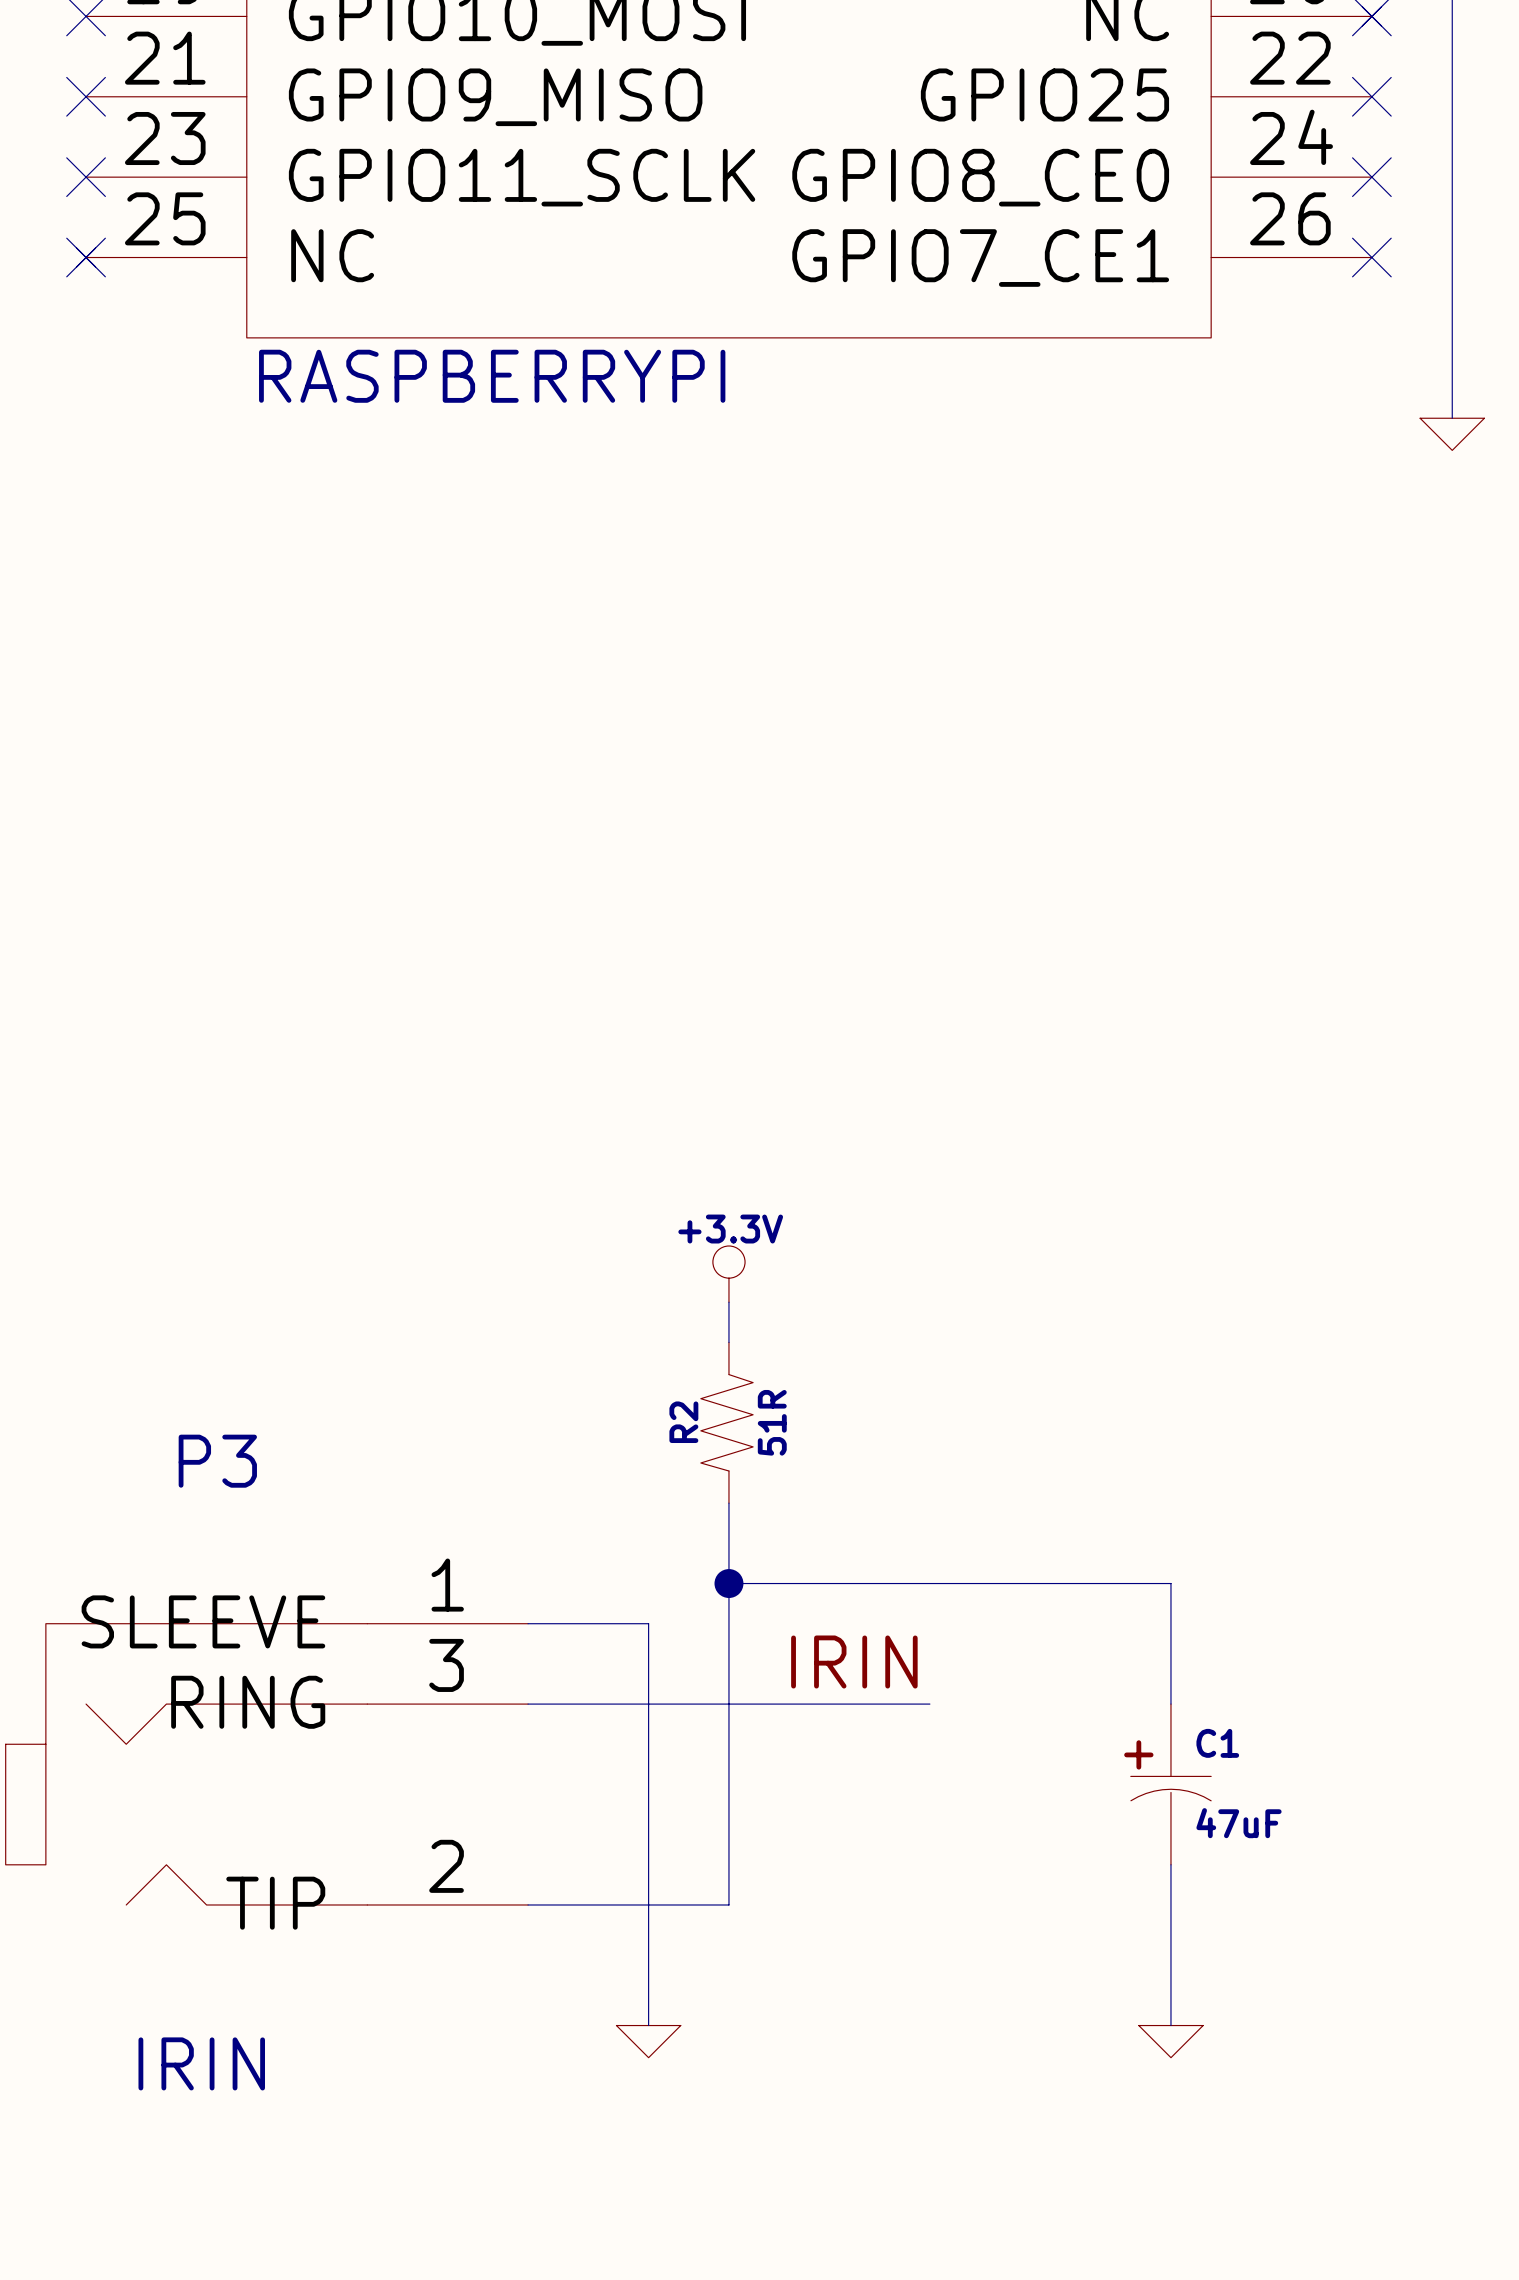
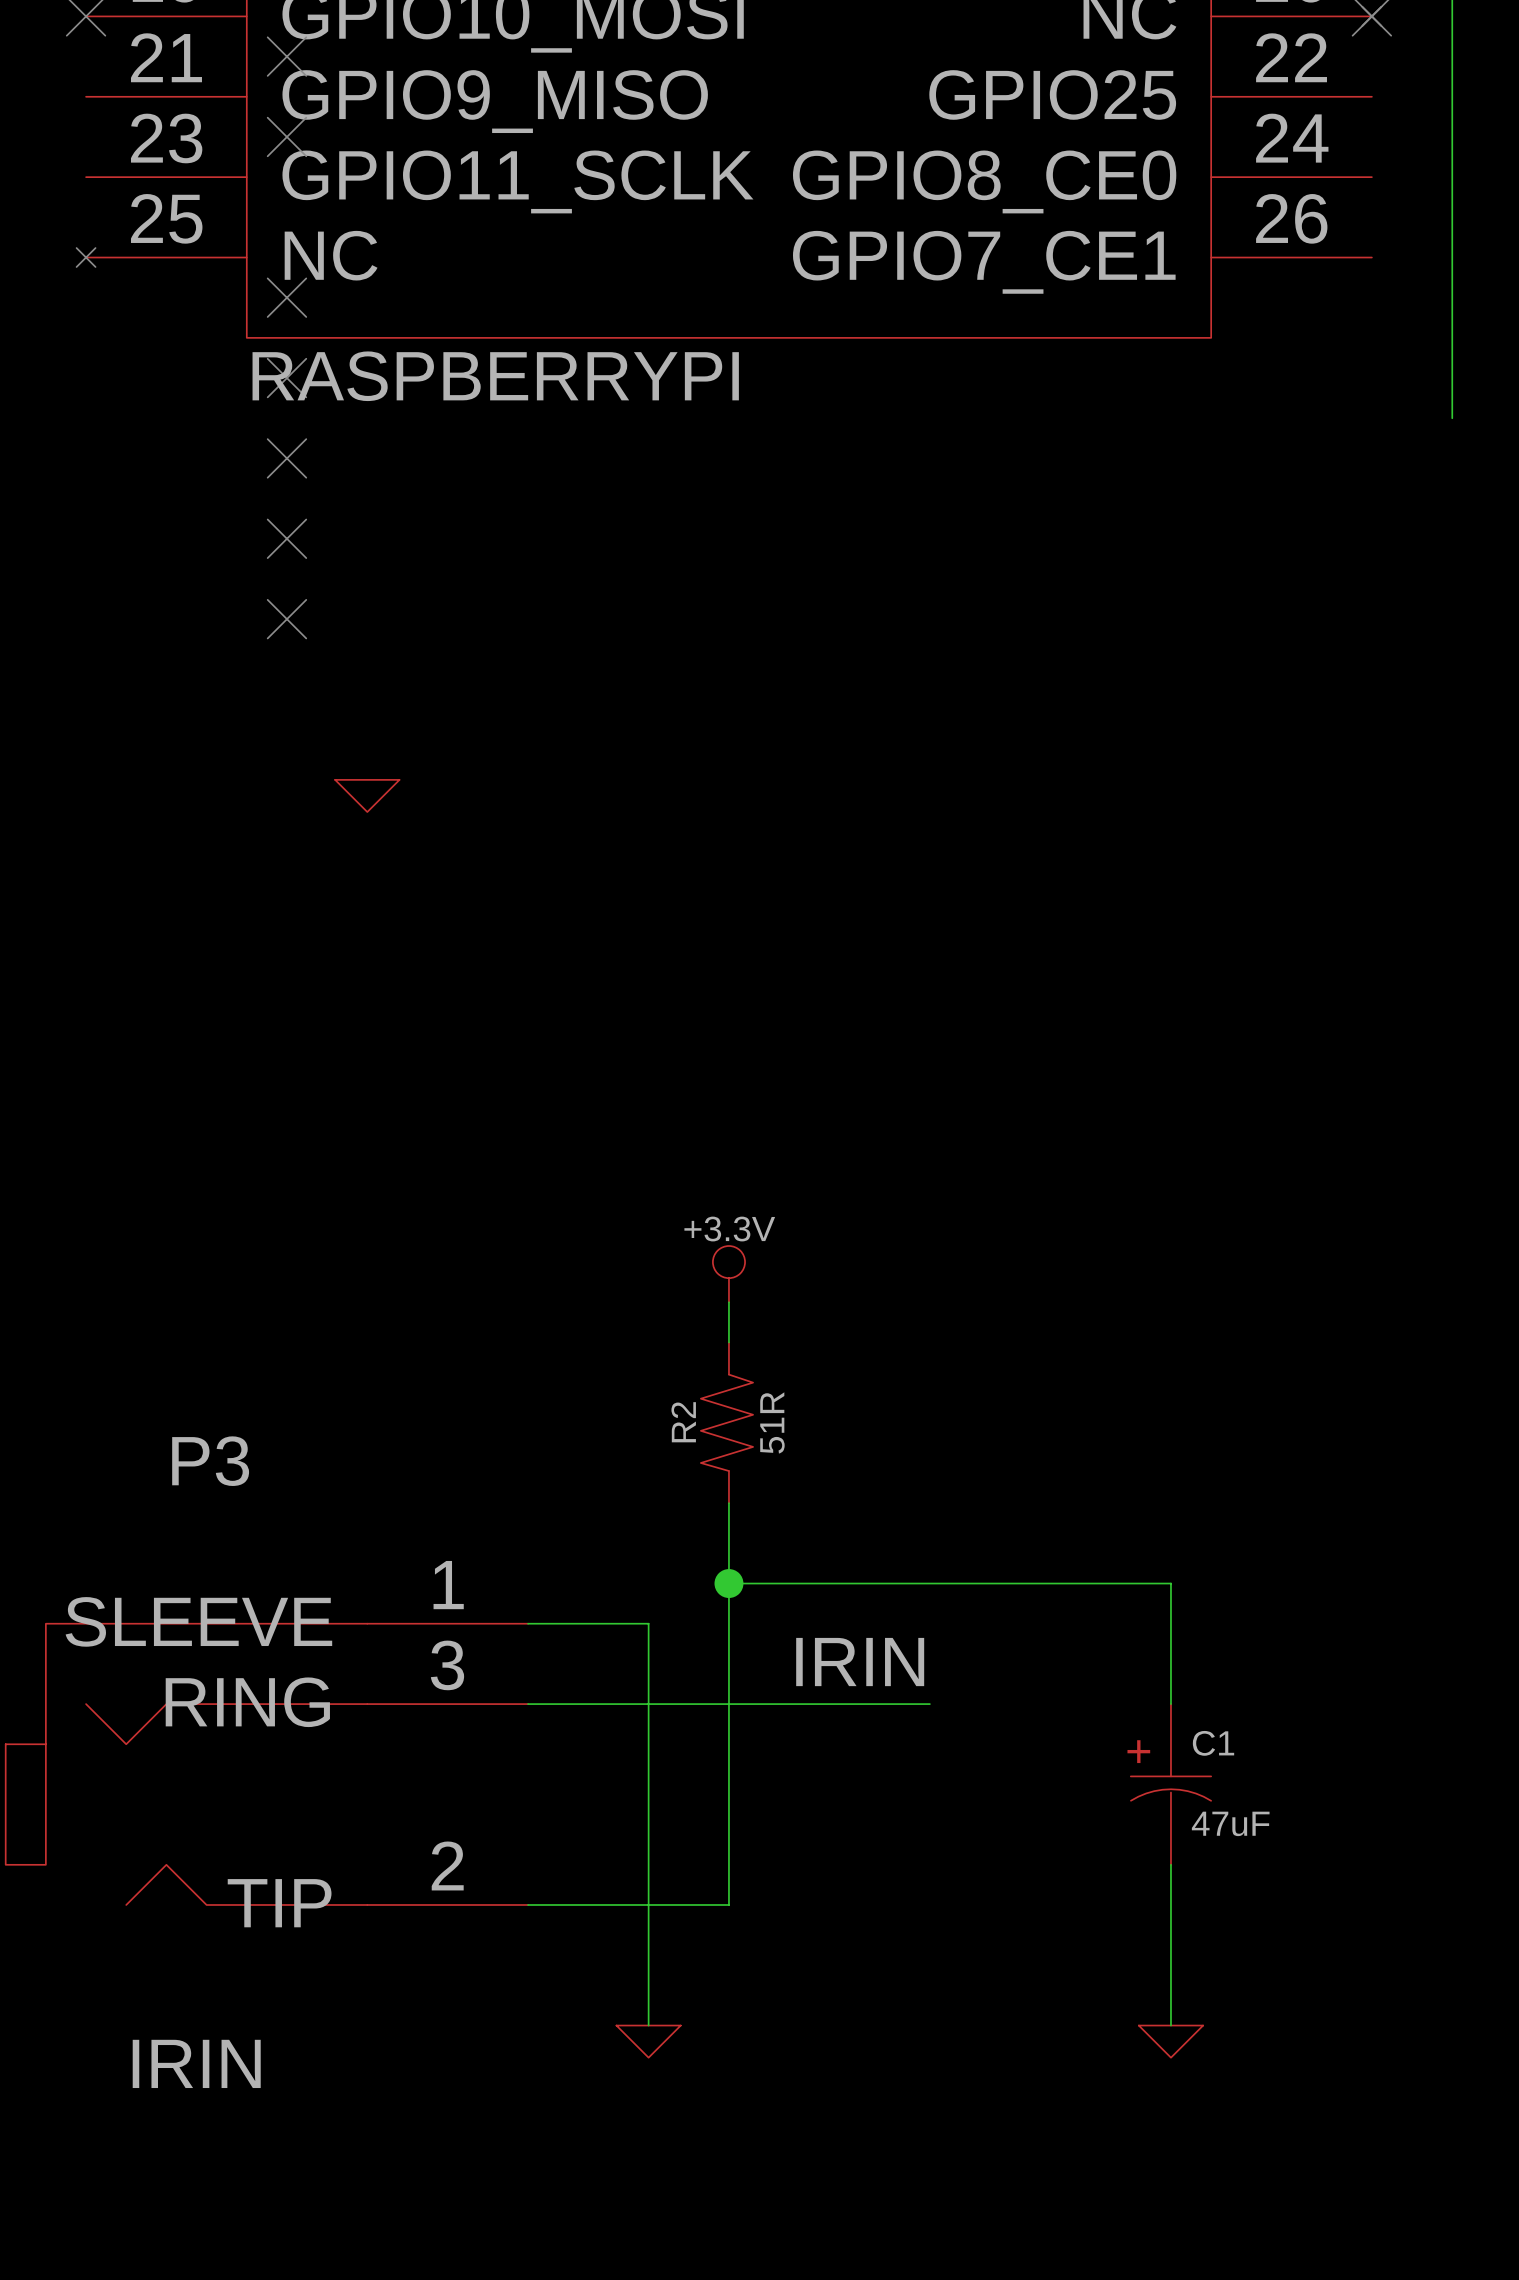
no-connect mark: none -> (286, 56)
no-connect mark: (86, 96) -> none
no-connect mark: (1371, 96) -> none
no-connect mark: none -> (286, 136)
no-connect mark: (86, 177) -> none
no-connect mark: (1371, 177) -> none
no-connect mark: (86, 257) -> none
no-connect mark: (1371, 257) -> none
no-connect mark: none -> (286, 297)
no-connect mark: none -> (286, 378)
power symbol: (1452, 434) -> none
no-connect mark: none -> (286, 458)
no-connect mark: none -> (286, 538)
no-connect mark: none -> (286, 619)
power symbol: none -> (367, 795)

